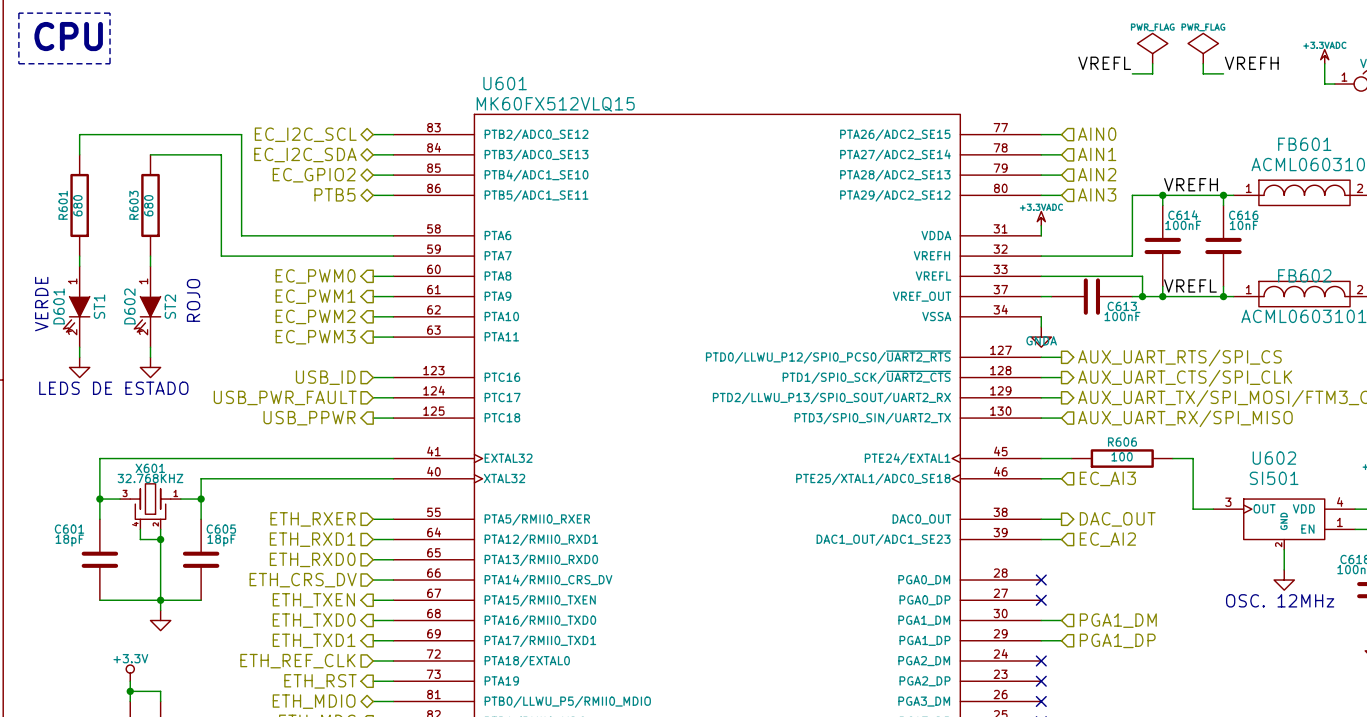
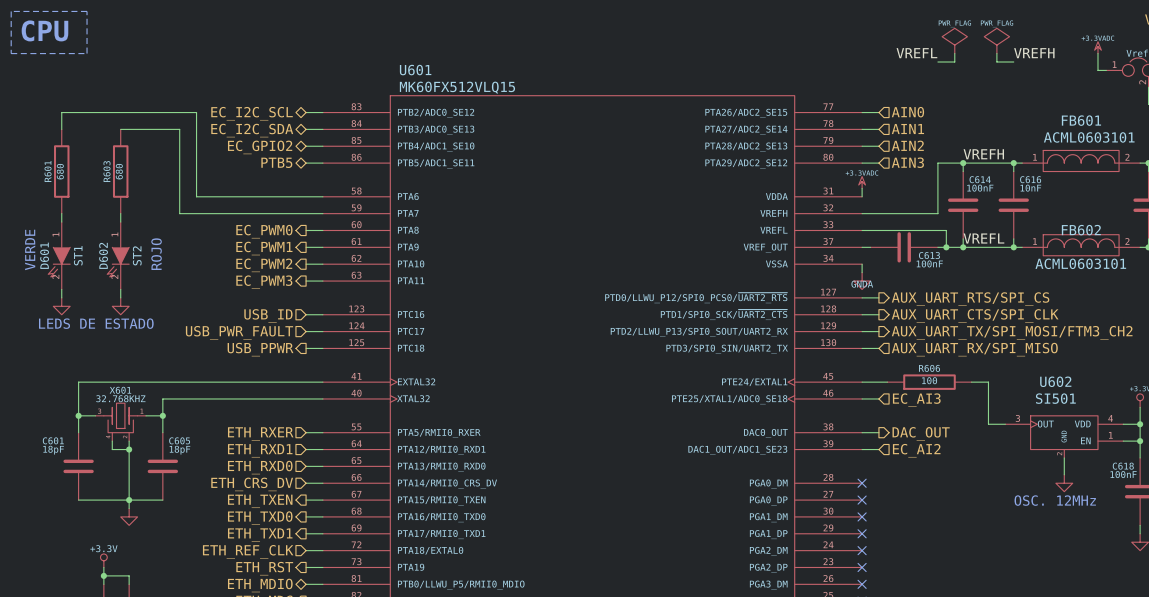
wire: (1041, 620) (1061, 620) -> none
no-connect mark: none -> (862, 516)
hierarchical label: PGA1_DM (1118, 620) -> none
wire: (1041, 640) (1061, 640) -> none
no-connect mark: none -> (862, 533)
hierarchical label: PGA1_DP (1117, 640) -> none

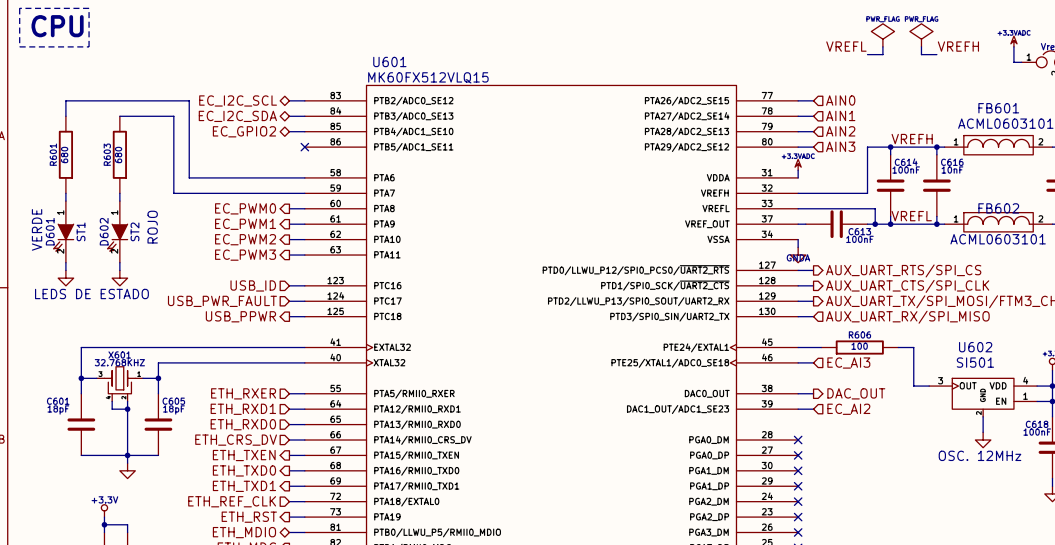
hierarchical label: PTB5 (276, 162) -> none
wire: (306, 163) (322, 163) -> none
no-connect mark: none -> (304, 147)

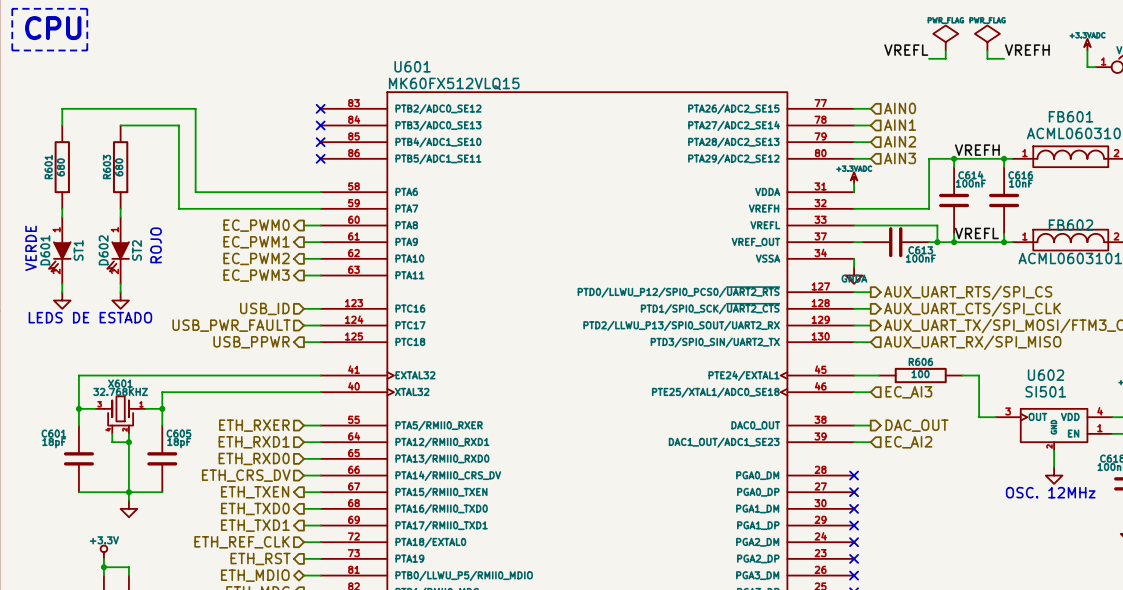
hierarchical label: EC_I2C_SCL (238, 100) -> none
wire: (289, 100) (304, 100) -> none
no-connect mark: none -> (320, 108)
hierarchical label: EC_I2C_SDA (237, 116) -> none
wire: (289, 116) (304, 116) -> none
no-connect mark: none -> (320, 125)
hierarchical label: EC_GPIO2 (244, 131) -> none
wire: (289, 131) (304, 131) -> none
no-connect mark: none -> (320, 142)

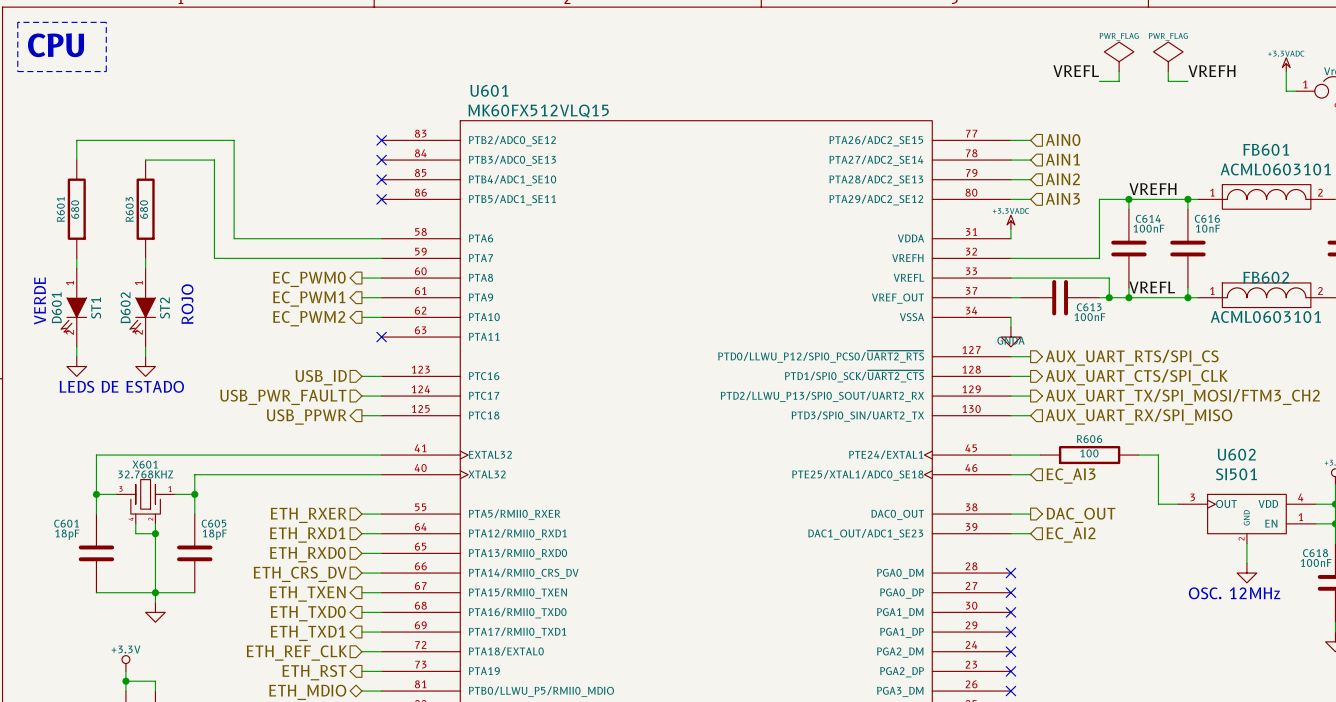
hierarchical label: EC_PWM3 (256, 275) -> none
wire: (303, 275) (320, 275) -> none
no-connect mark: none -> (381, 337)

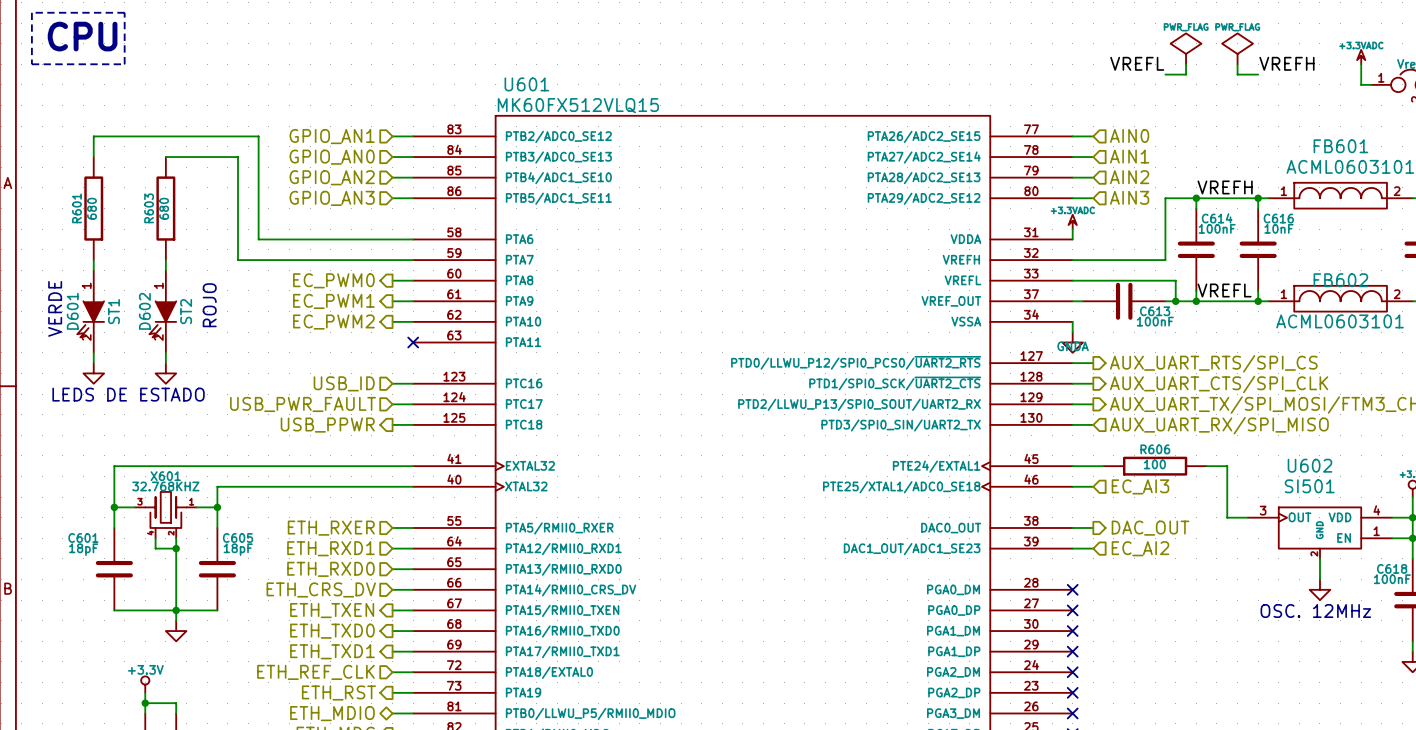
wire: none -> (392, 136) (413, 136)
no-connect mark: (381, 140) -> none
hierarchical label: none -> GPIO_AN1 (332, 136)
wire: none -> (392, 157) (413, 157)
no-connect mark: (381, 160) -> none
hierarchical label: none -> GPIO_AN0 (332, 157)
wire: none -> (392, 177) (413, 177)
no-connect mark: (381, 179) -> none
hierarchical label: none -> GPIO_AN2 (332, 177)
wire: none -> (392, 198) (413, 198)
no-connect mark: (381, 199) -> none
hierarchical label: none -> GPIO_AN3 (332, 198)

